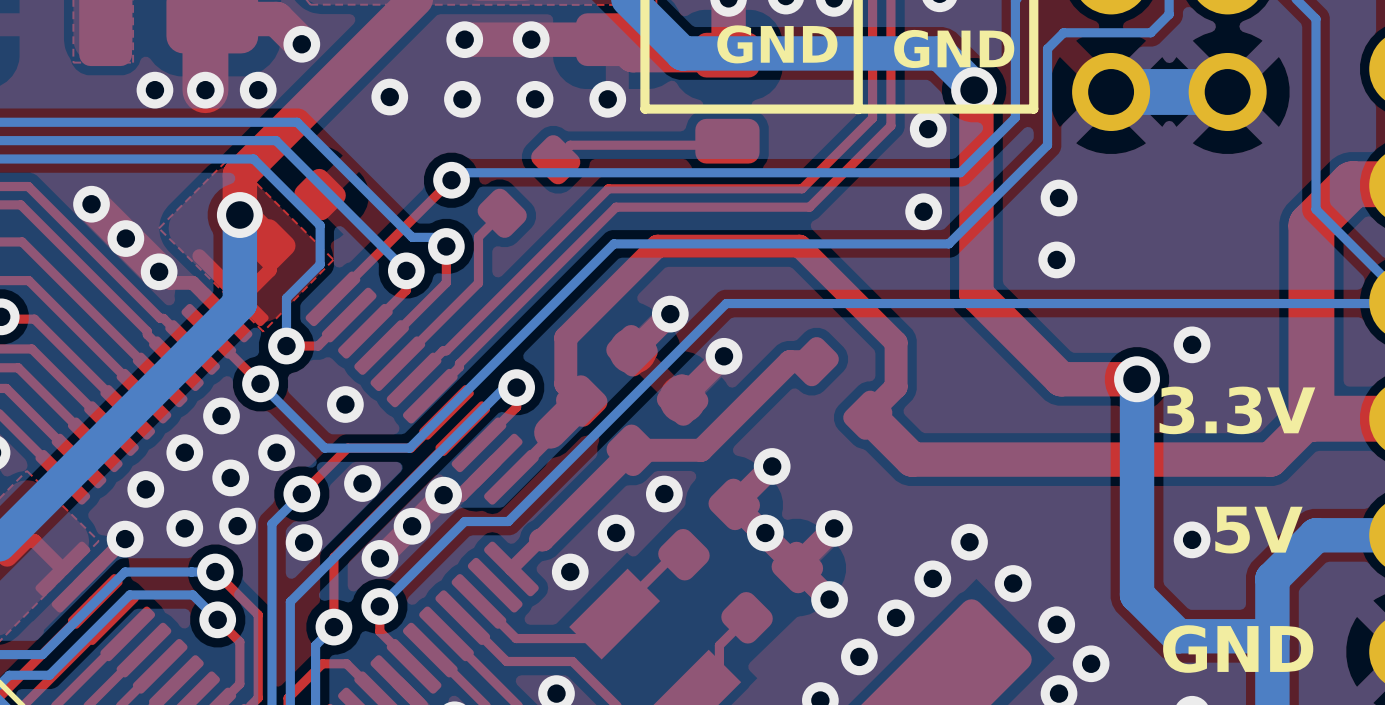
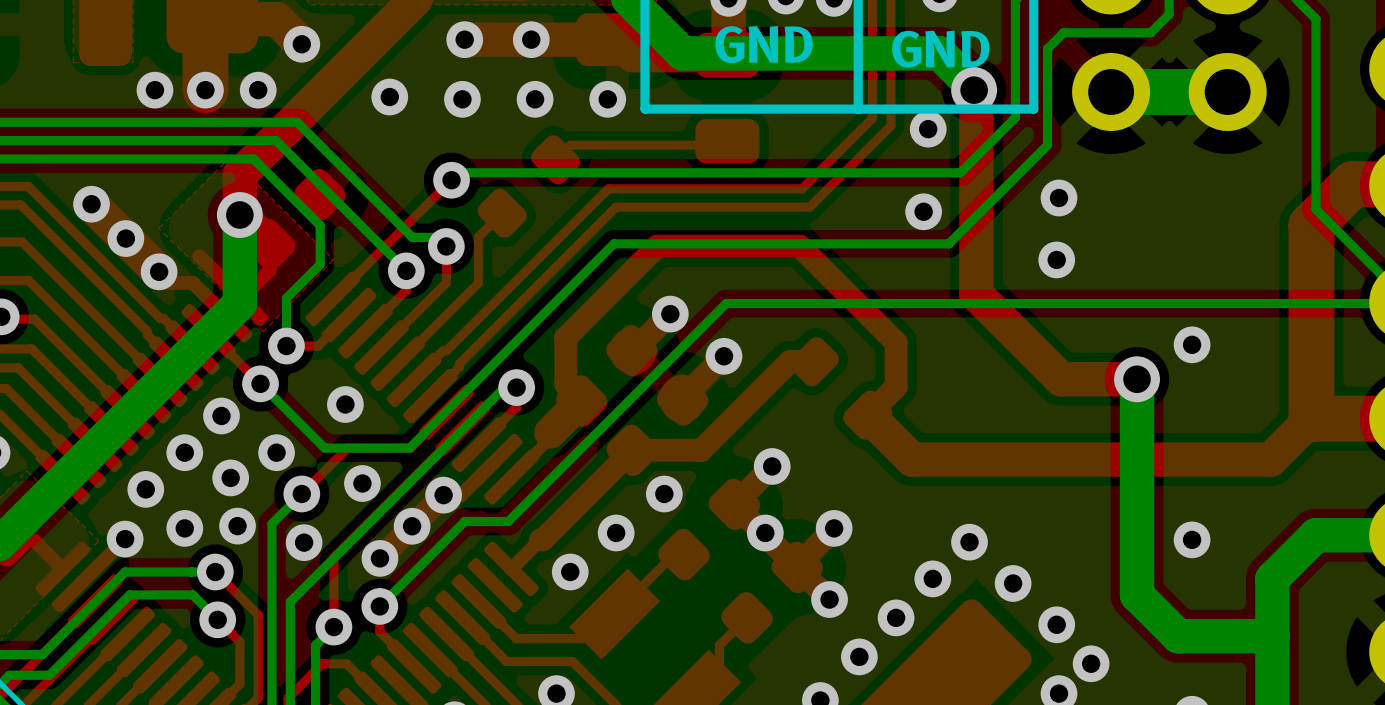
text: 3.3V (1237, 410) -> none
text: 5V (1258, 530) -> none
text: GND (1238, 649) -> none

